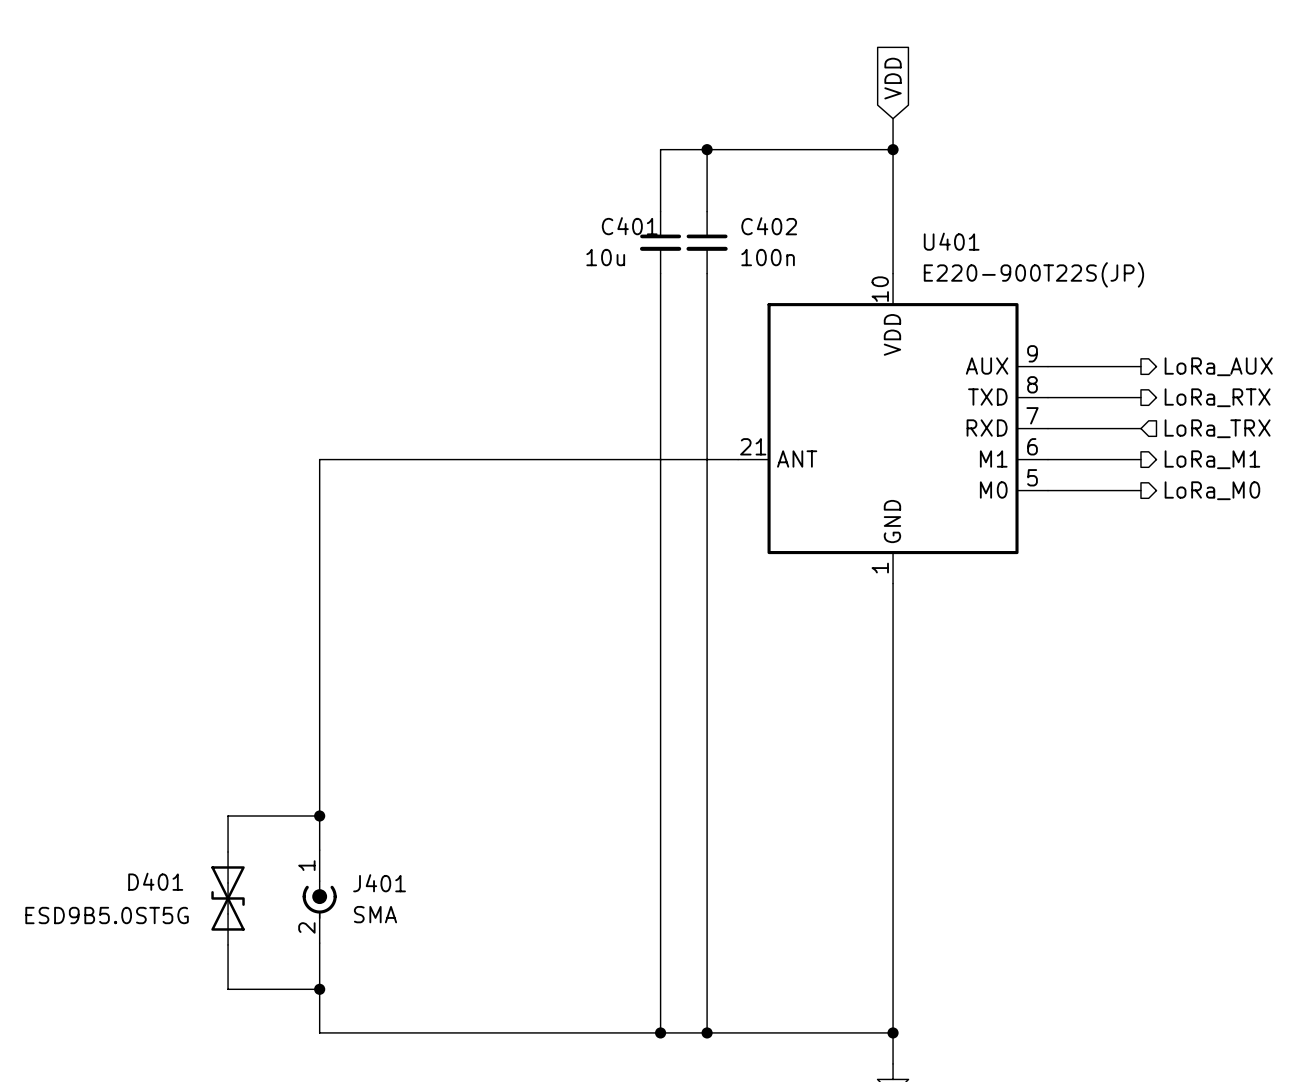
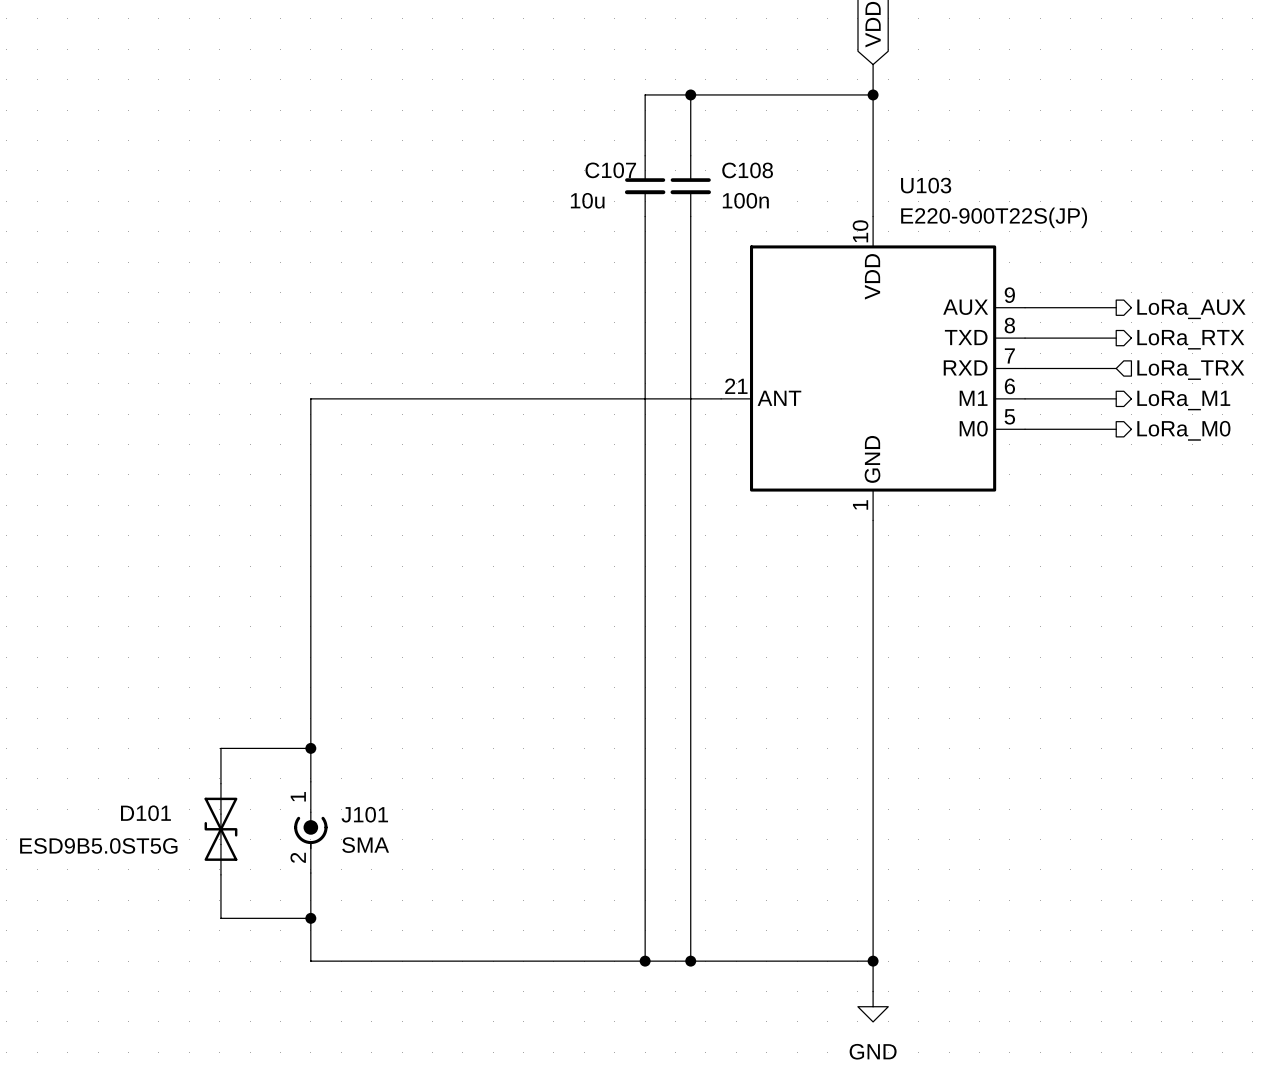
C401 name: C401 (629, 226) -> C107 (610, 170)
C402 name: C402 (769, 226) -> C108 (747, 170)
U401 name: U401 (951, 241) -> U103 (926, 185)
D401 name: D401 (155, 881) -> D101 (145, 813)
J401 name: J401 (379, 883) -> J101 (364, 814)

